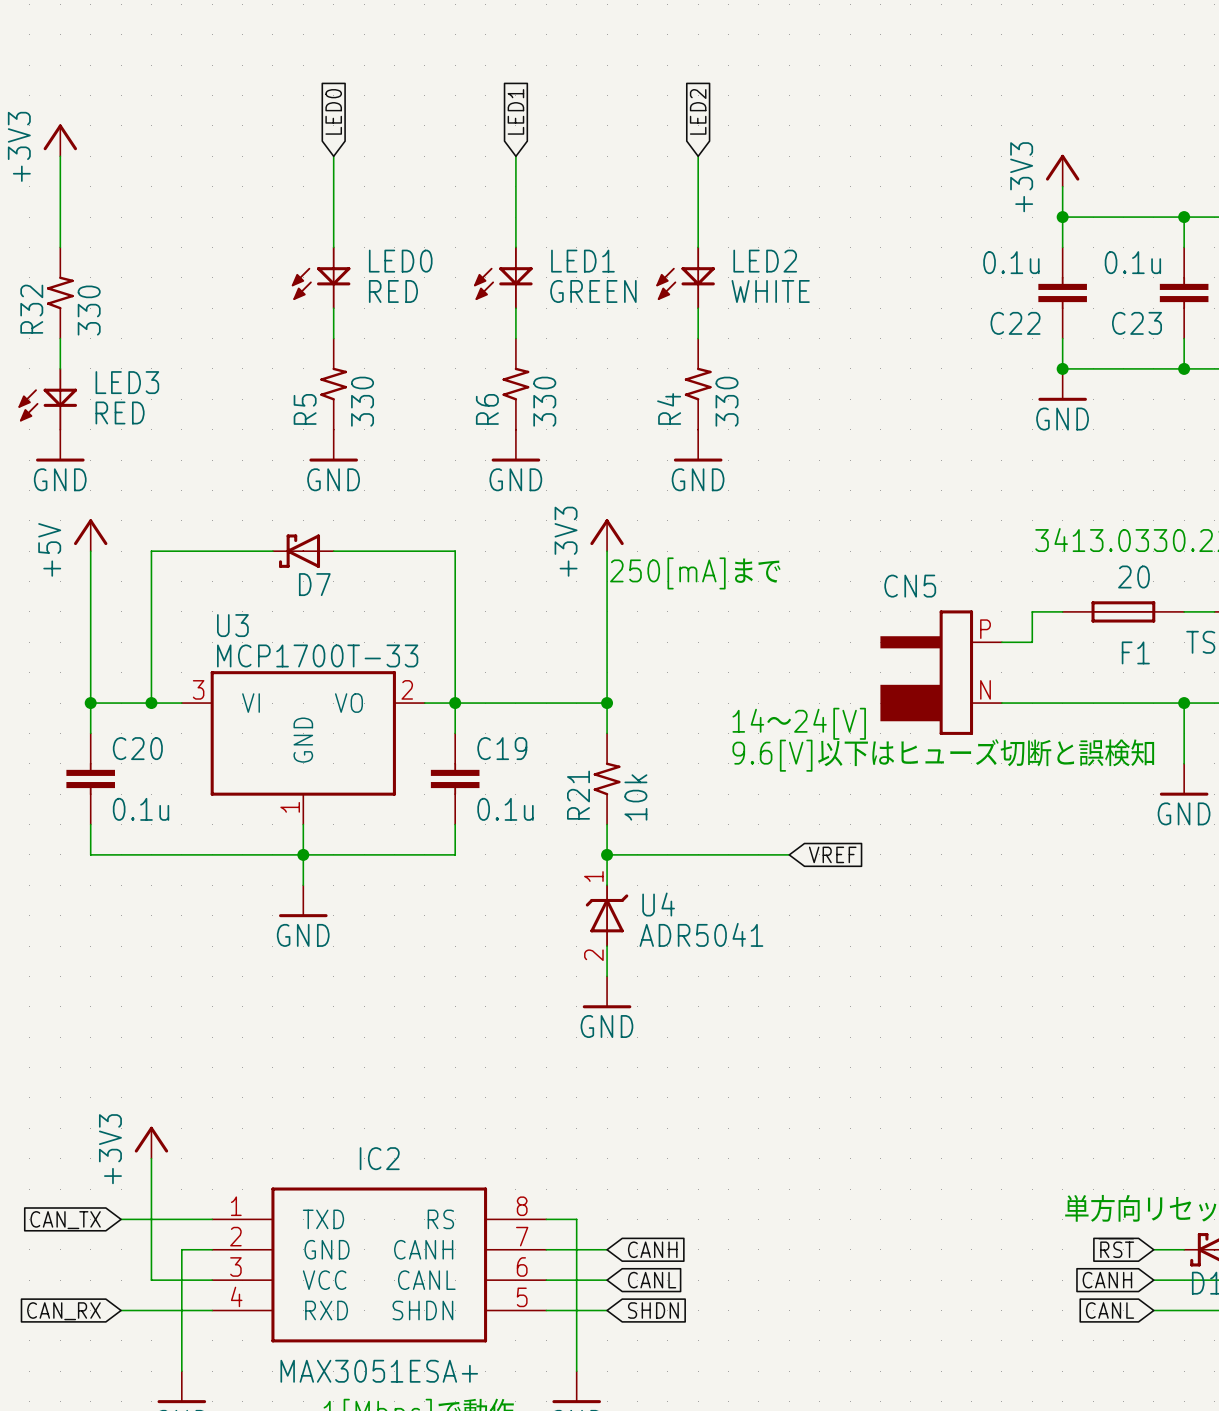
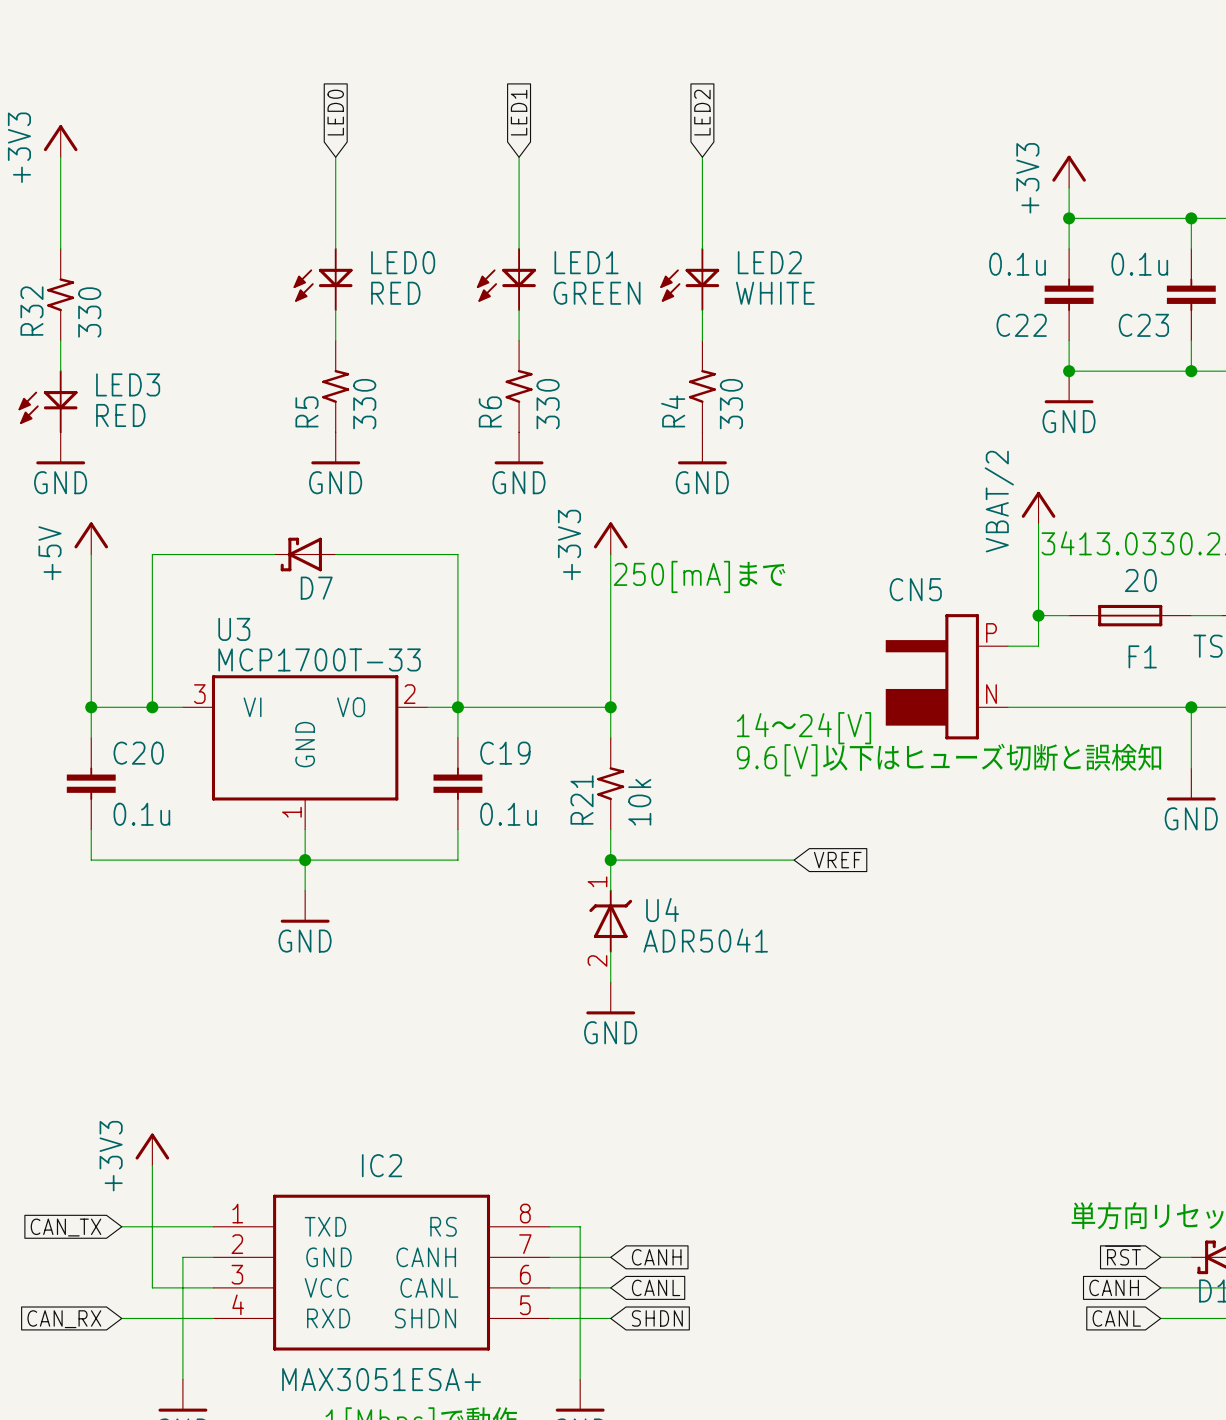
power symbol: none -> VBAT/2 (1038, 507)
wire: none -> (1038, 523) (1038, 615)
junction: none -> (1038, 615)

